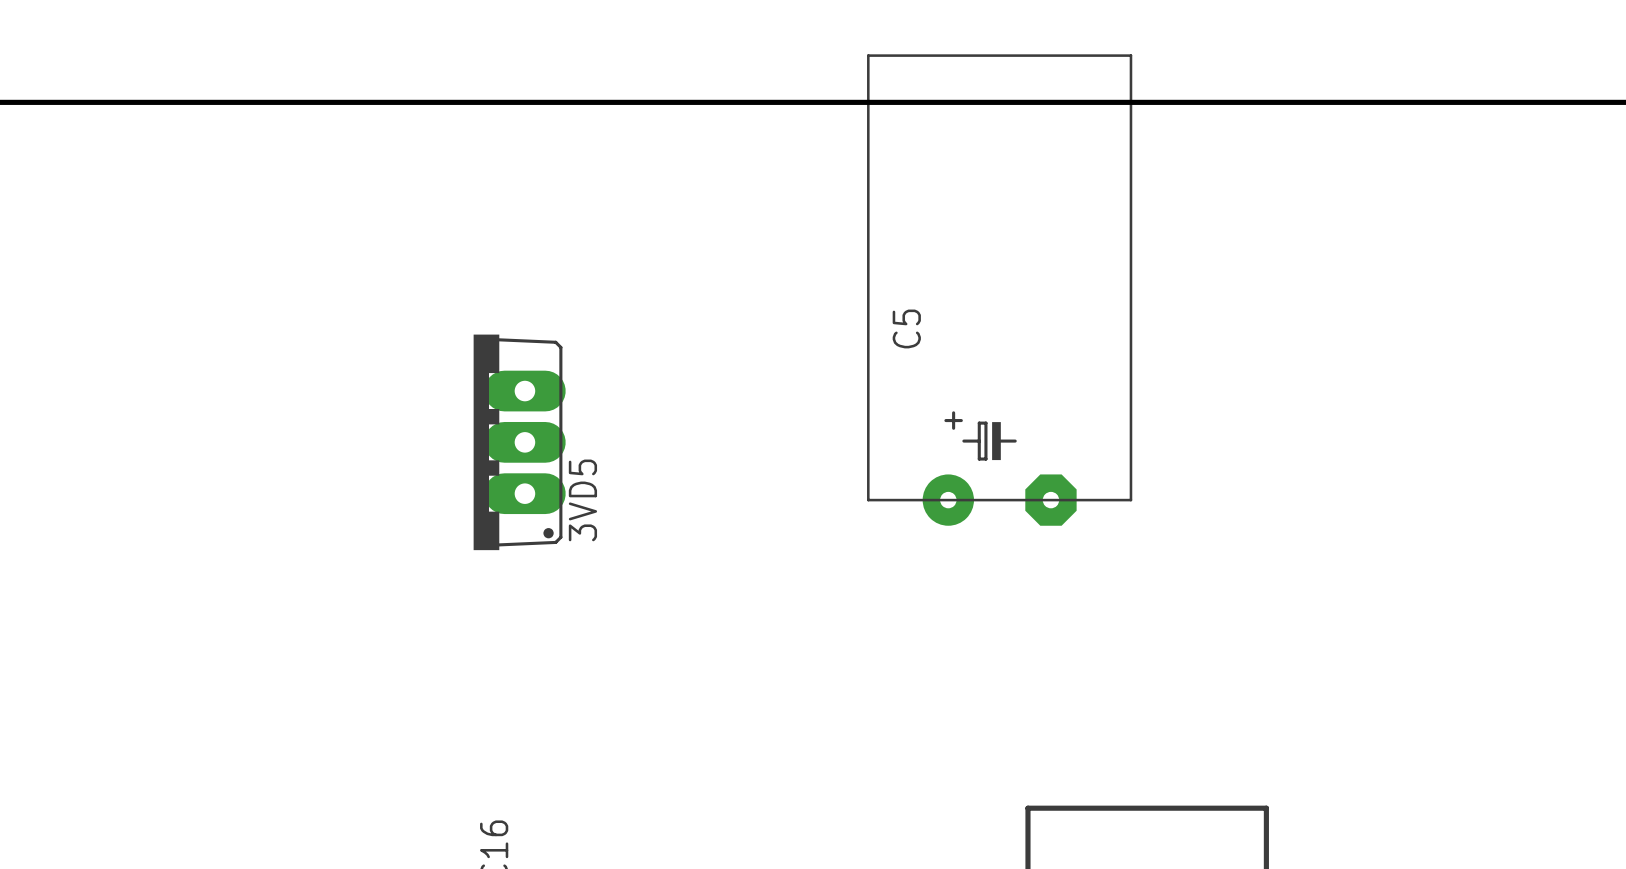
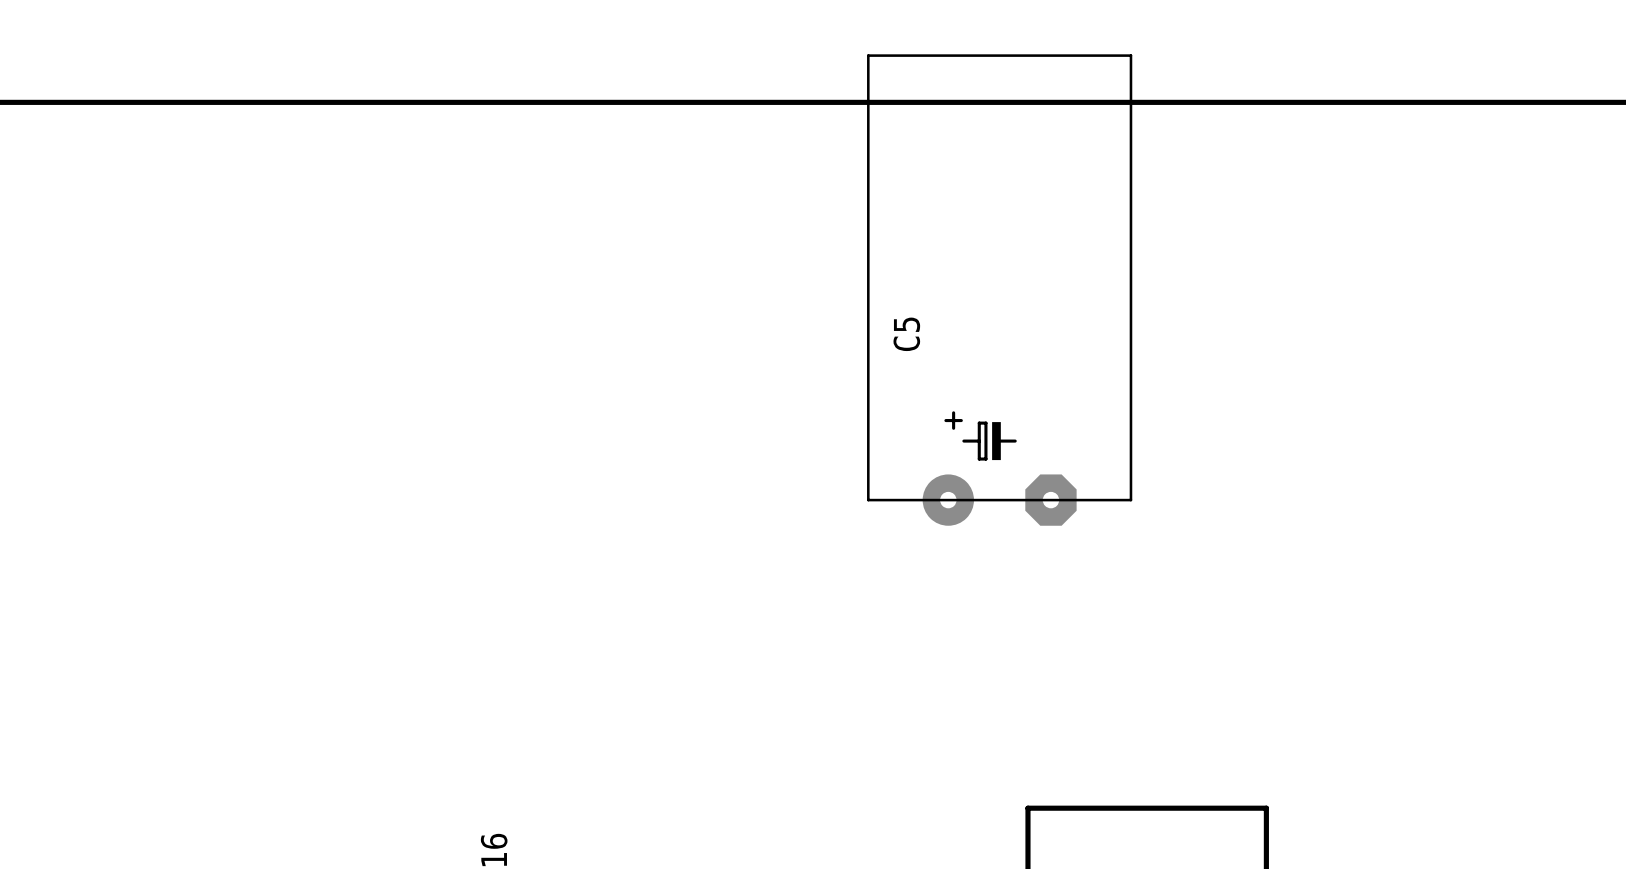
3VD5: (519, 442) -> none

